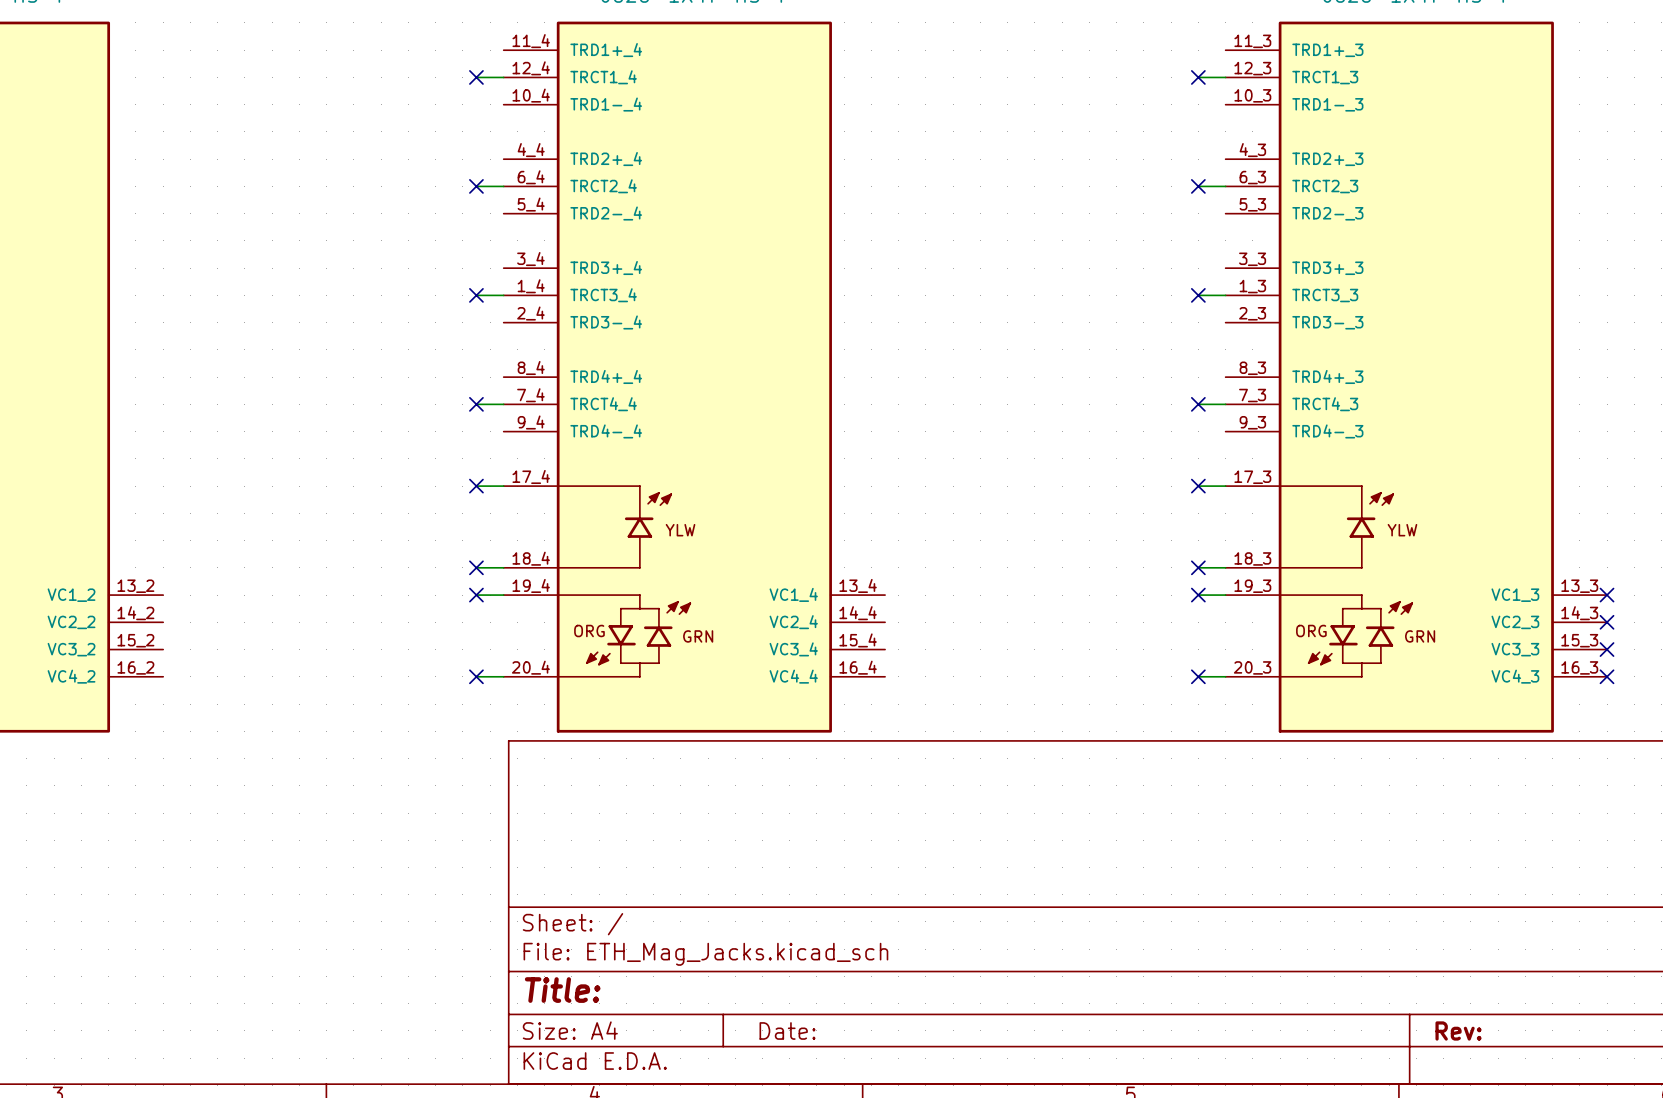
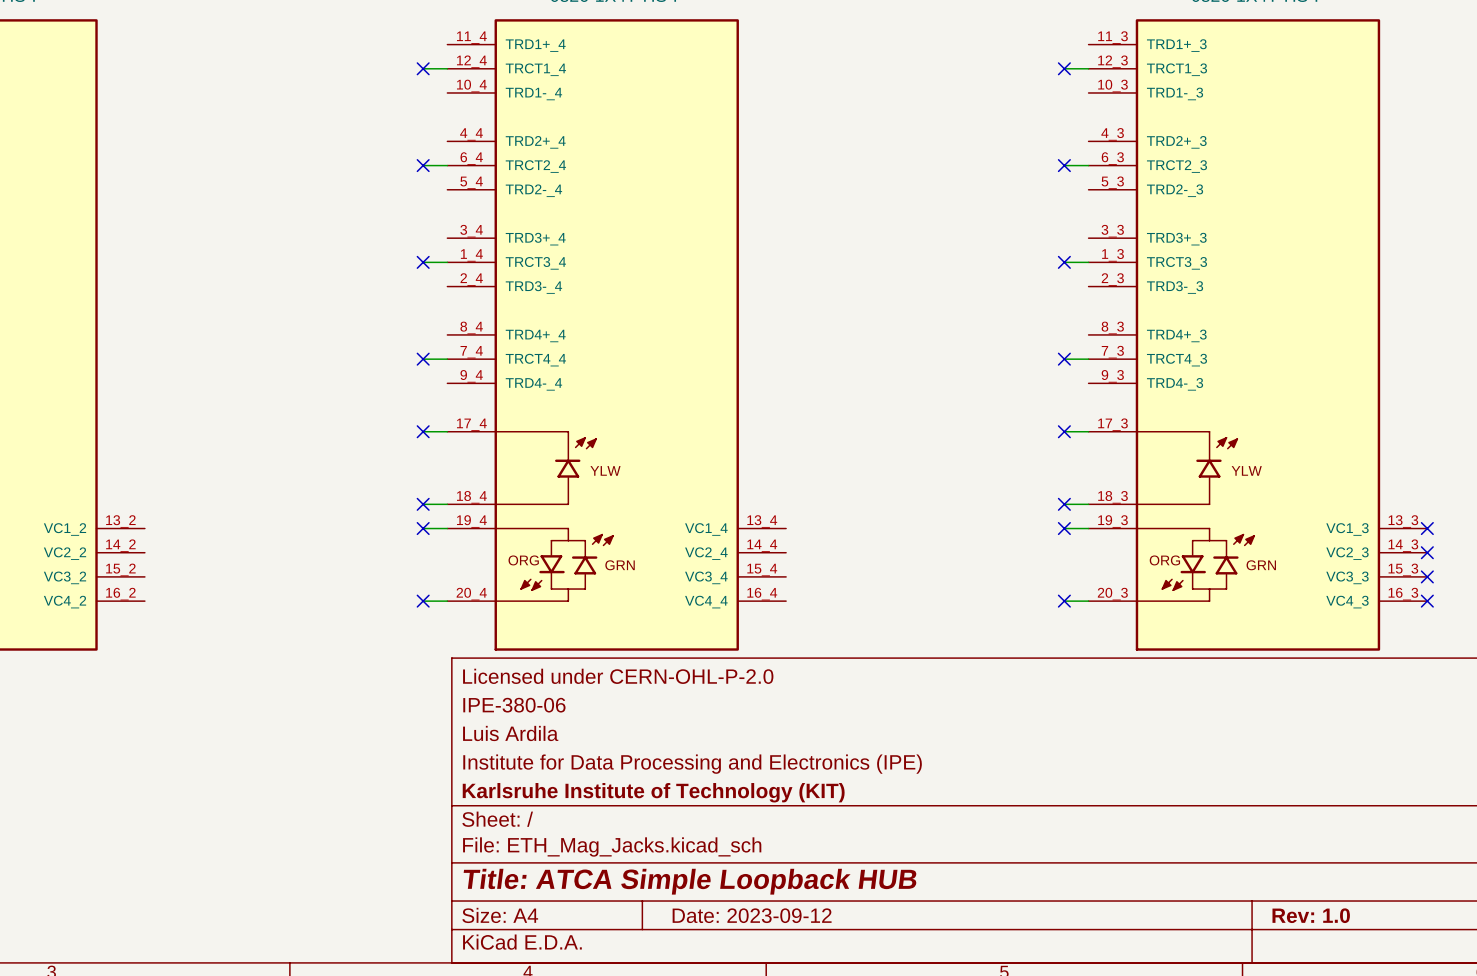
title block: none -> Licensed under CERN-OHL-P-2.0 (618, 676)
title block: none -> IPE-380-06 (514, 705)
title block: none -> Luis Ardila (510, 733)
title block: none -> Institute for Data Processing and Electronics (IPE) (692, 764)
title block: none -> Karlsruhe Institute of Technology (KIT) (653, 792)
title block: Title: (562, 990) -> Title: ATCA Simple Loopback HUB (690, 881)
title block: Date: (787, 1030) -> Date: 2023-09-12 (752, 915)
title block: Rev: (1458, 1030) -> Rev: 1.0 (1311, 915)

